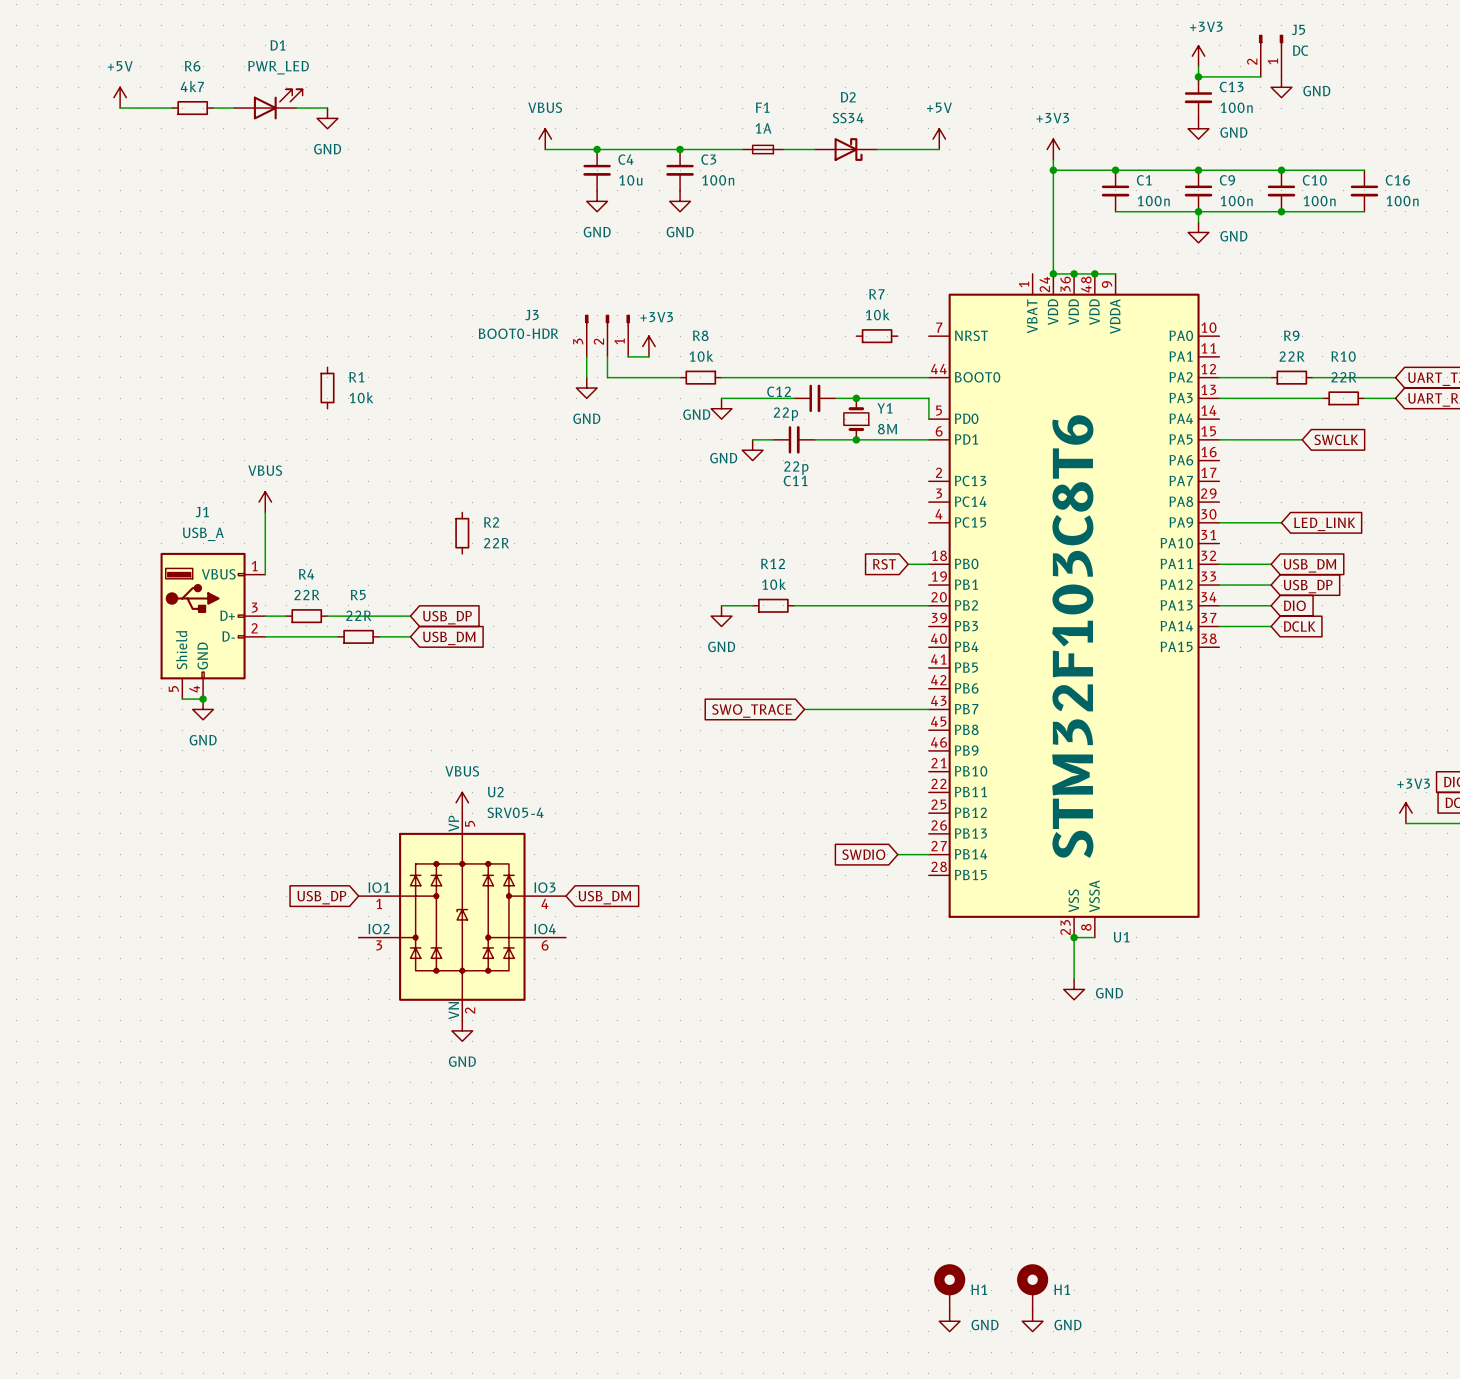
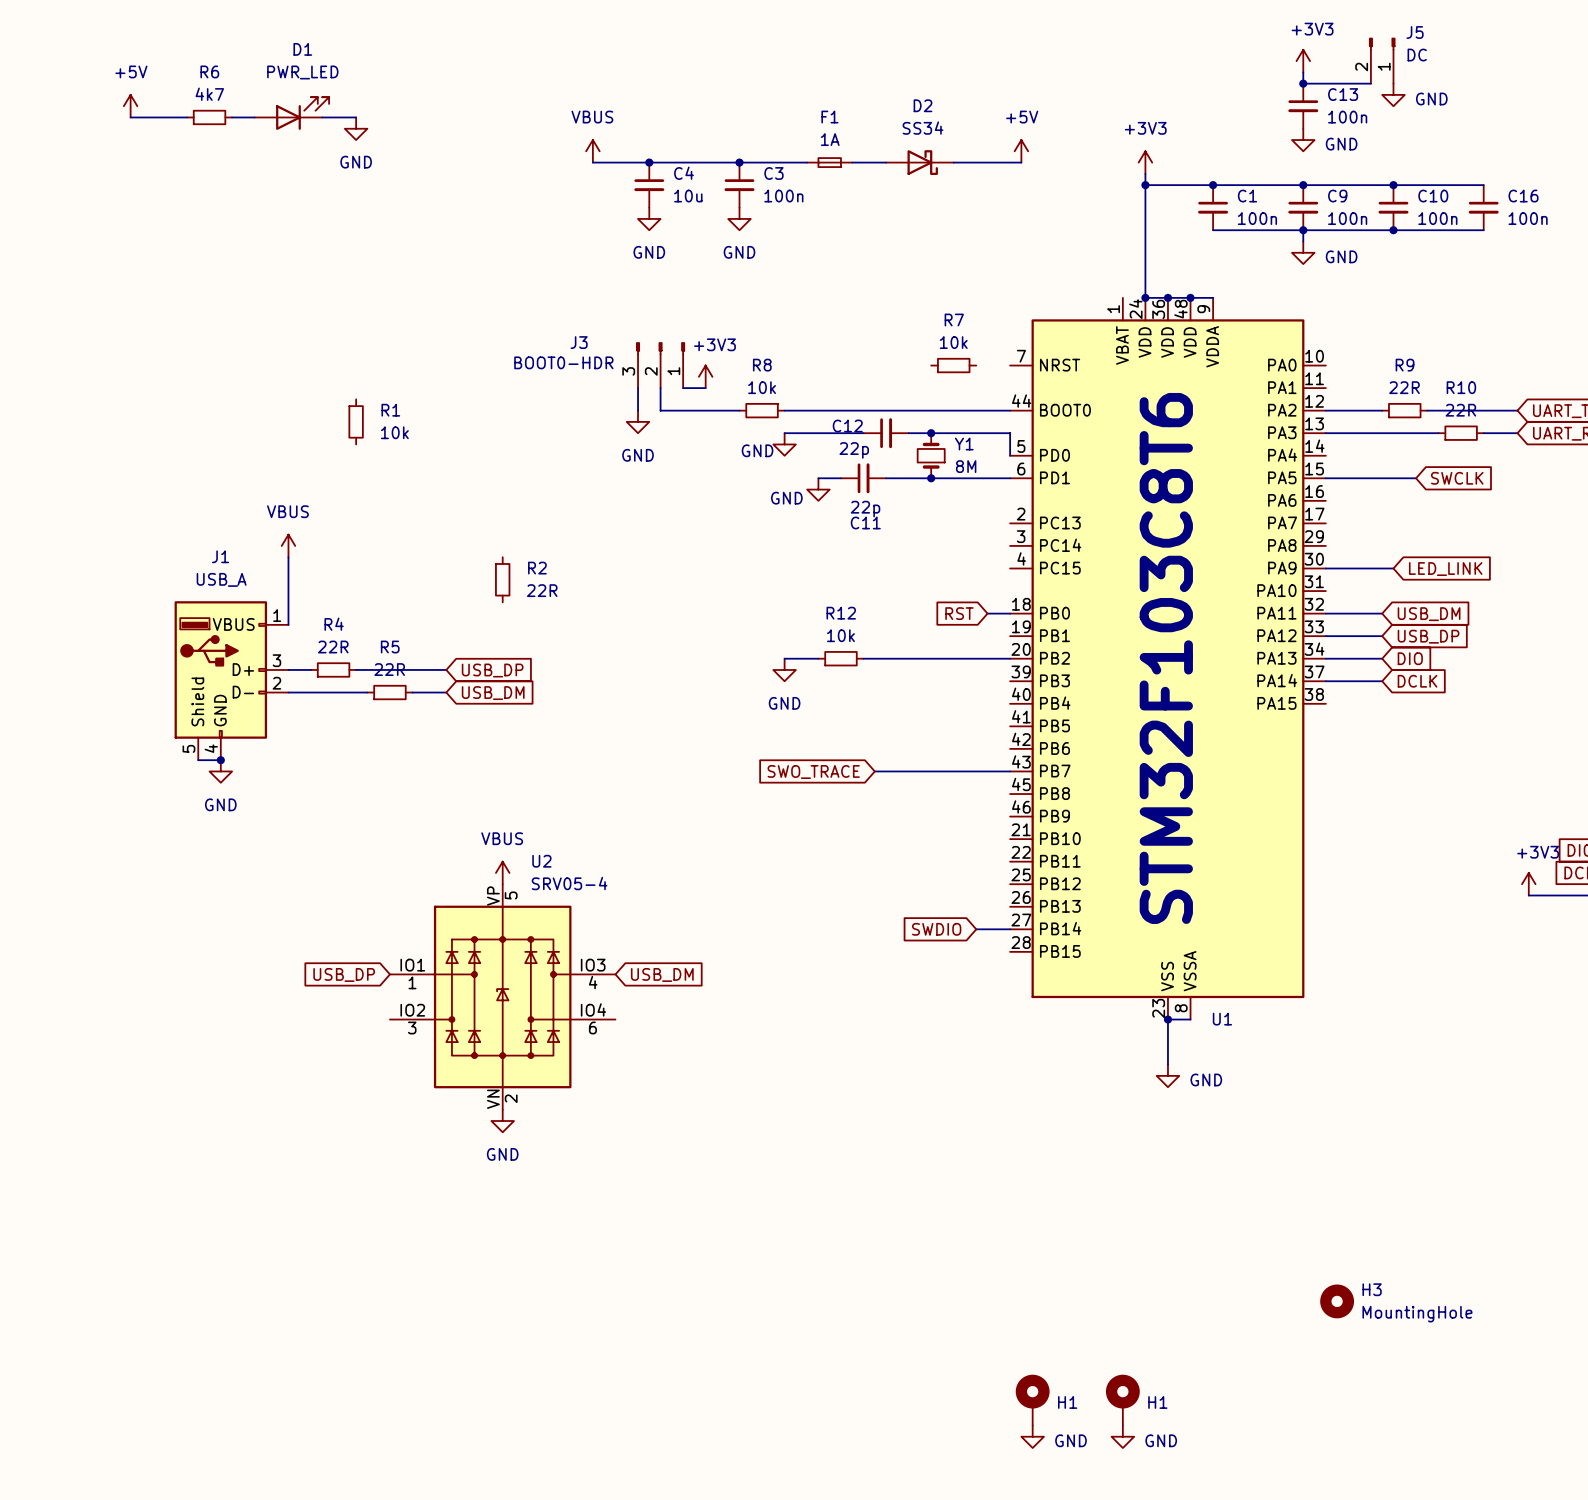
H3: none -> MountingHole (1337, 1301)

